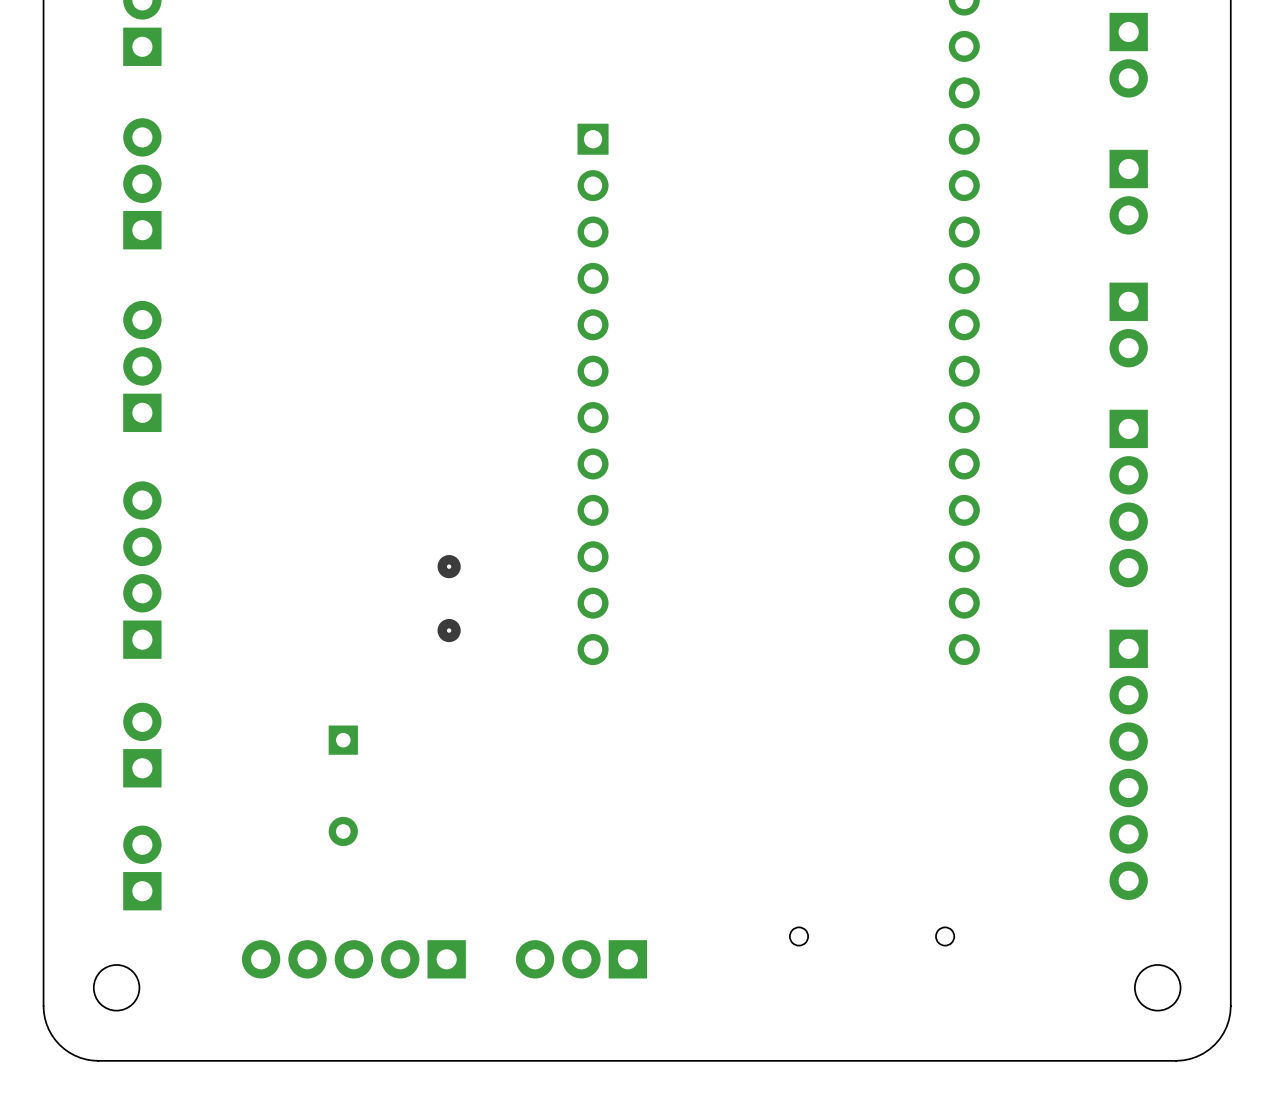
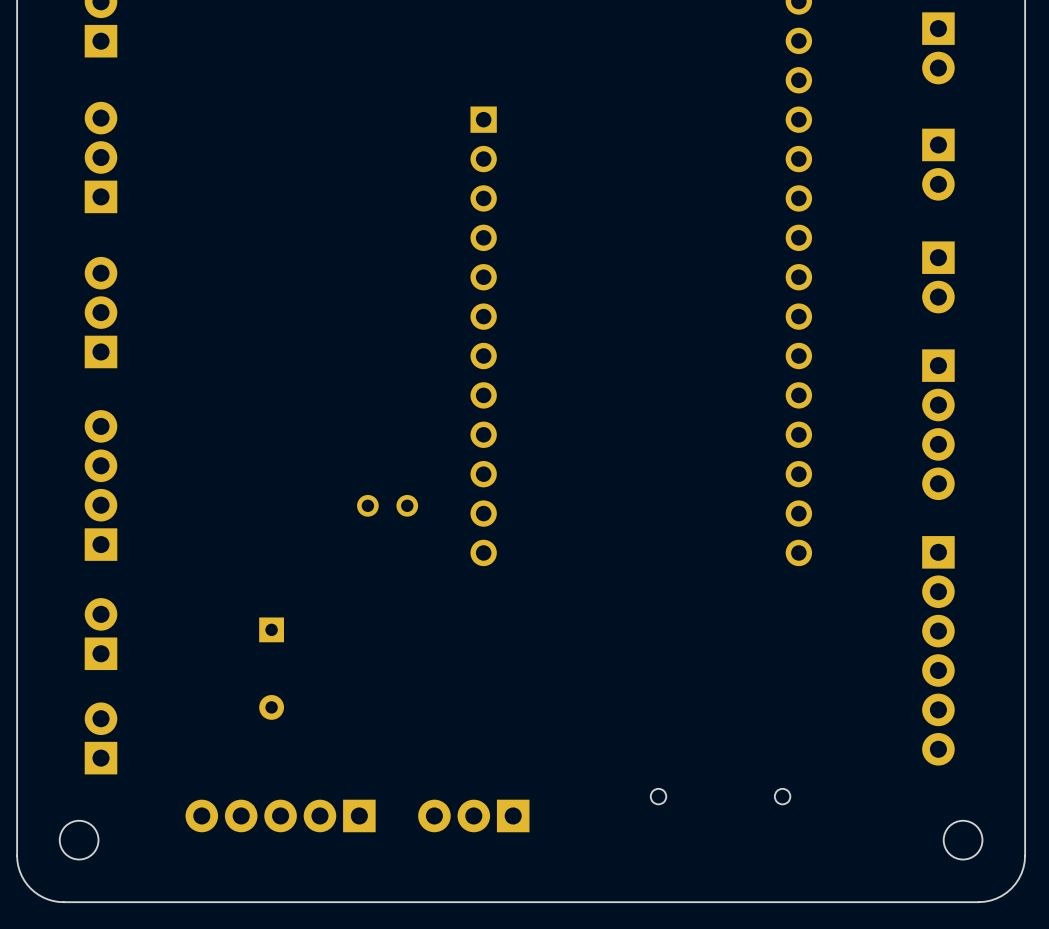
part: (449, 566) -> none
part: none -> (387, 505)
part: (449, 630) -> none

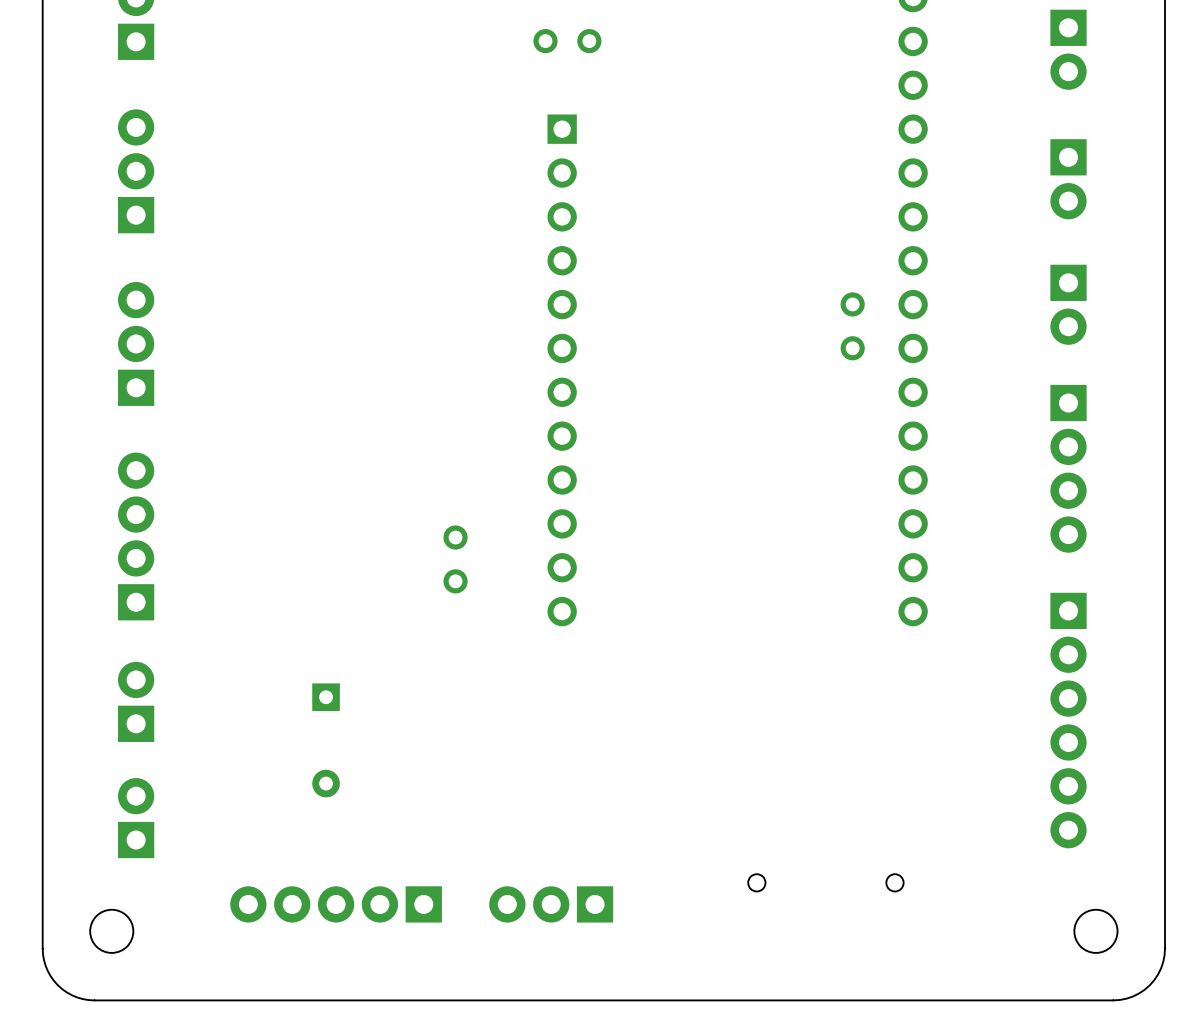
part: none -> (567, 41)
part: none -> (852, 326)
part rotation: 0° (387, 505) -> 90° clockwise (455, 559)

